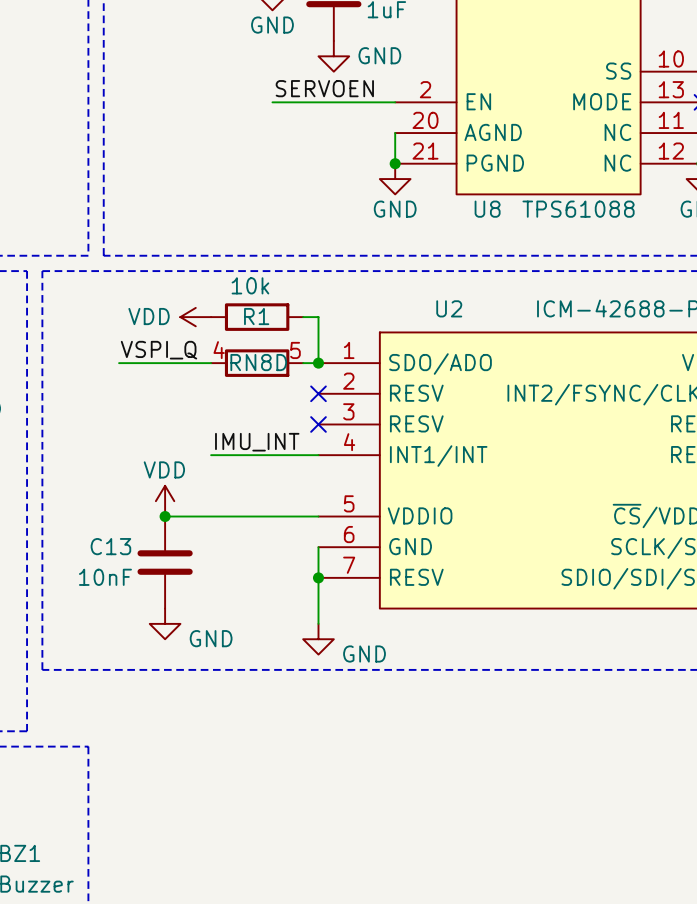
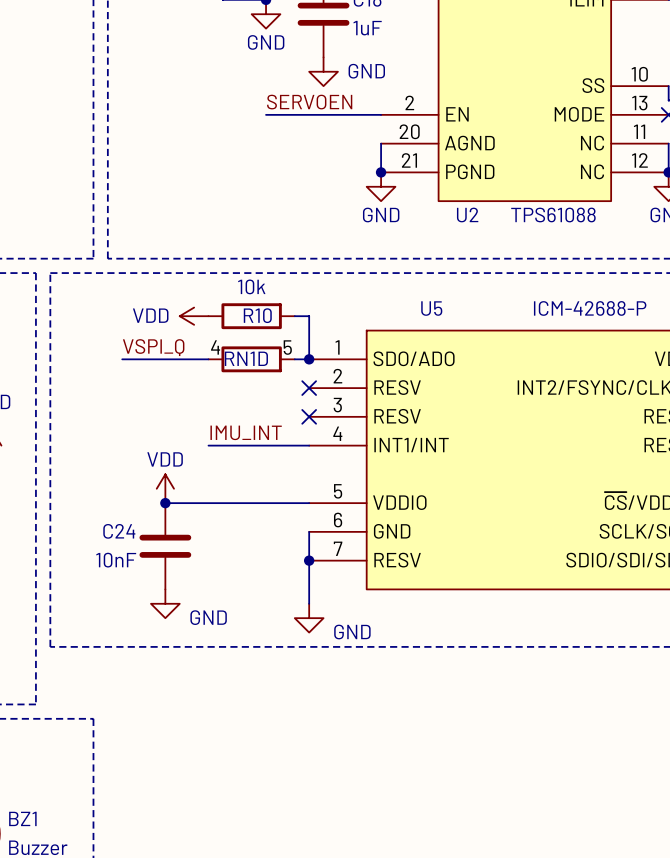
U8 name: U8 (487, 209) -> U2 (467, 215)
U2 name: U2 (449, 308) -> U5 (431, 308)
R1 name: R1 (256, 316) -> R10 (257, 315)
RN8D name: RN8D (258, 362) -> RN1D (246, 358)
C13 name: C13 (110, 546) -> C24 (119, 531)

